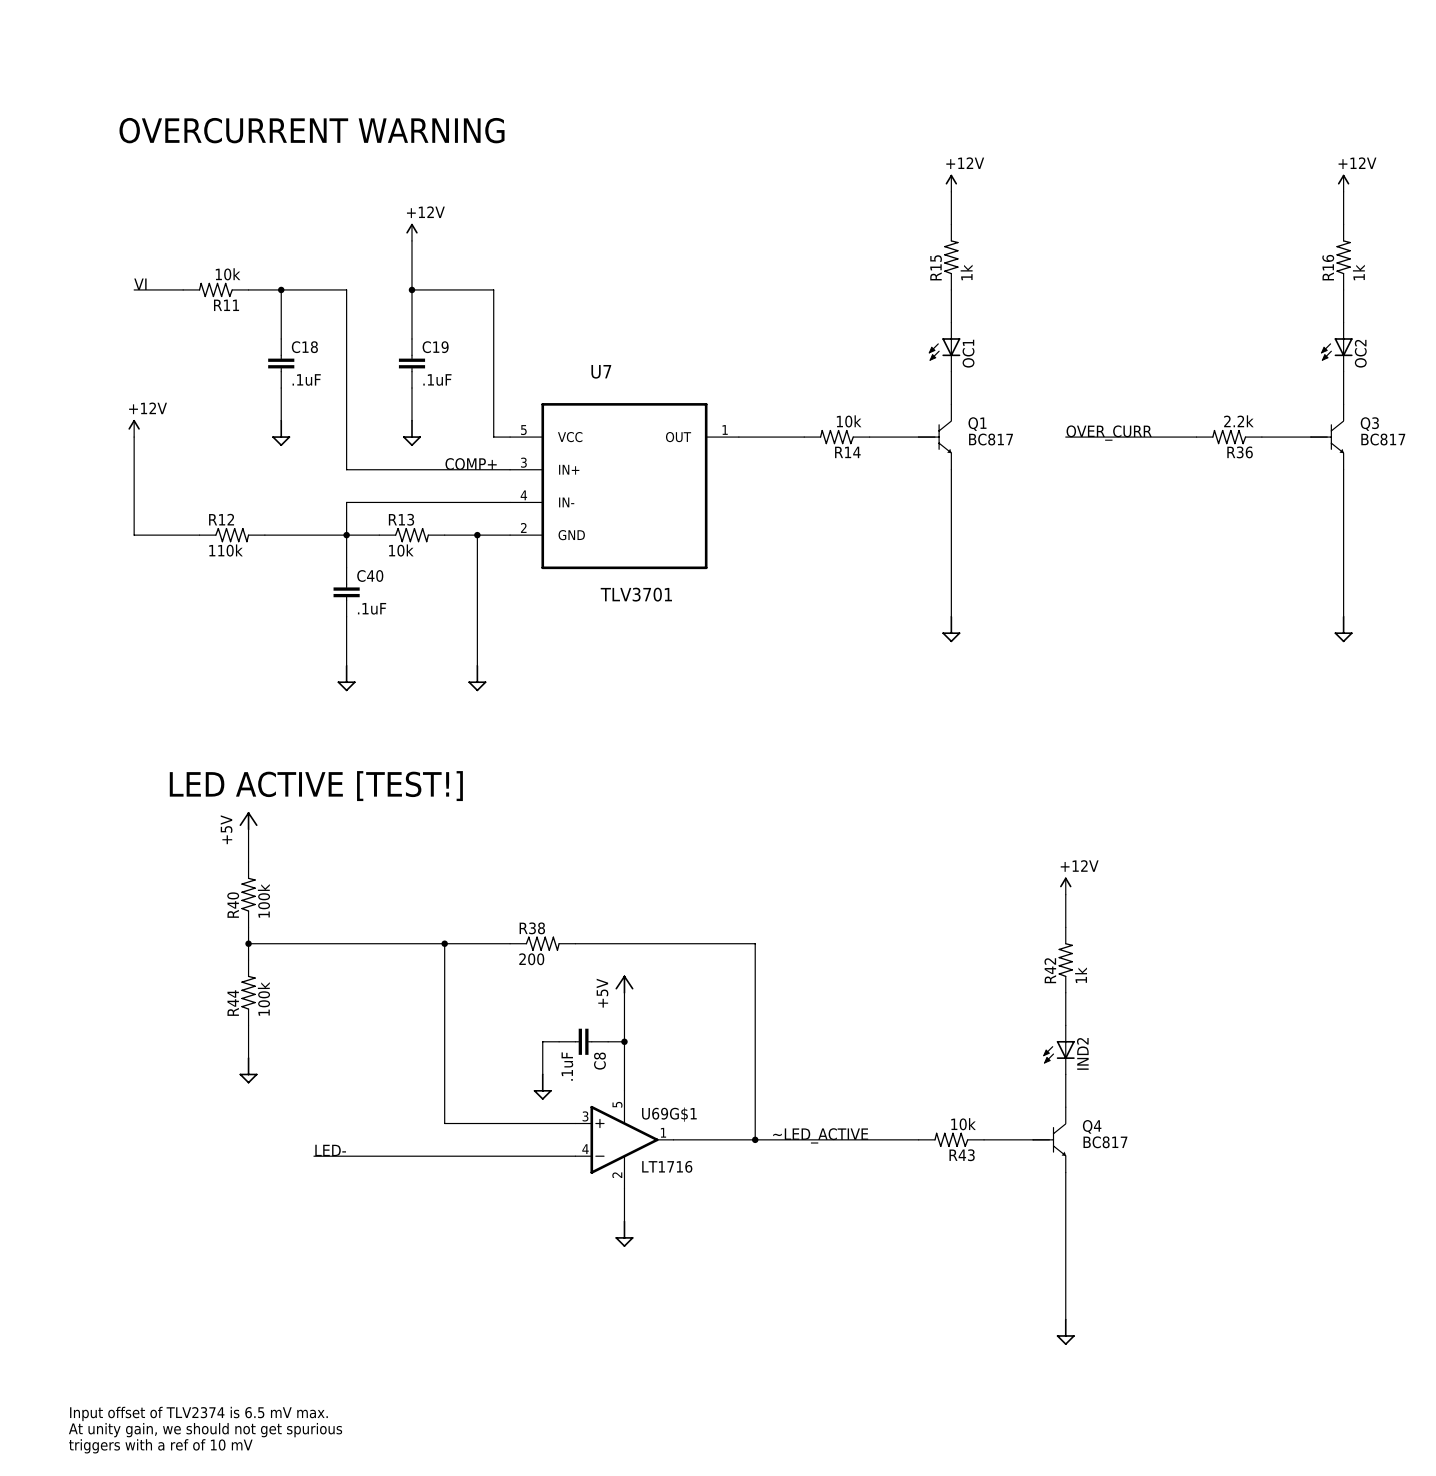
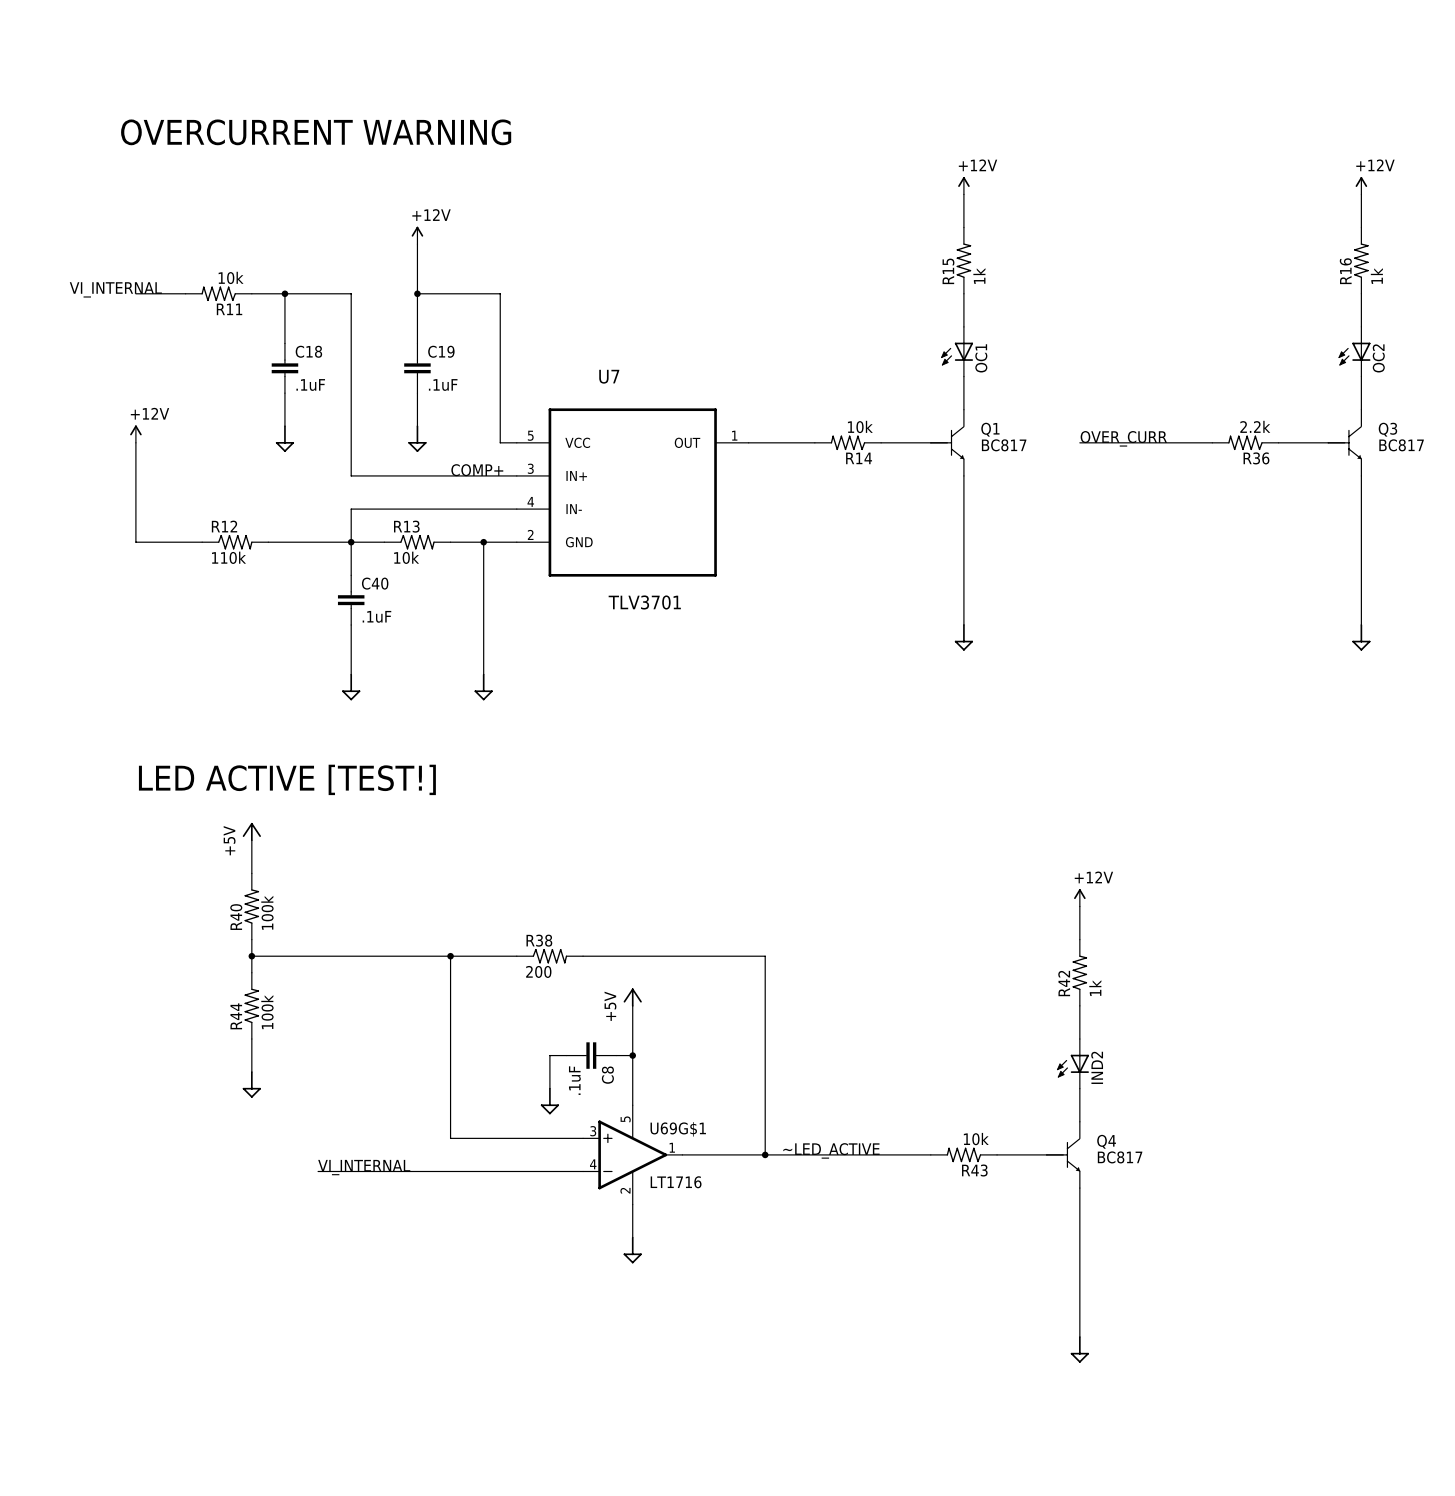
label: VI (140, 284) -> none
label: none -> VI_INTERNAL (115, 289)
text position: LED ACTIVE [TEST!] (316, 786) -> LED ACTIVE [TEST!] (287, 779)
label: LED- (330, 1150) -> VI_INTERNAL (364, 1167)
text: Input offset of TLV2374 is 6.5 mV max. (198, 1413) -> none
text: At unity gain, we should not get spurious (205, 1430) -> none
text: triggers with a ref of 10 mV (160, 1446) -> none

